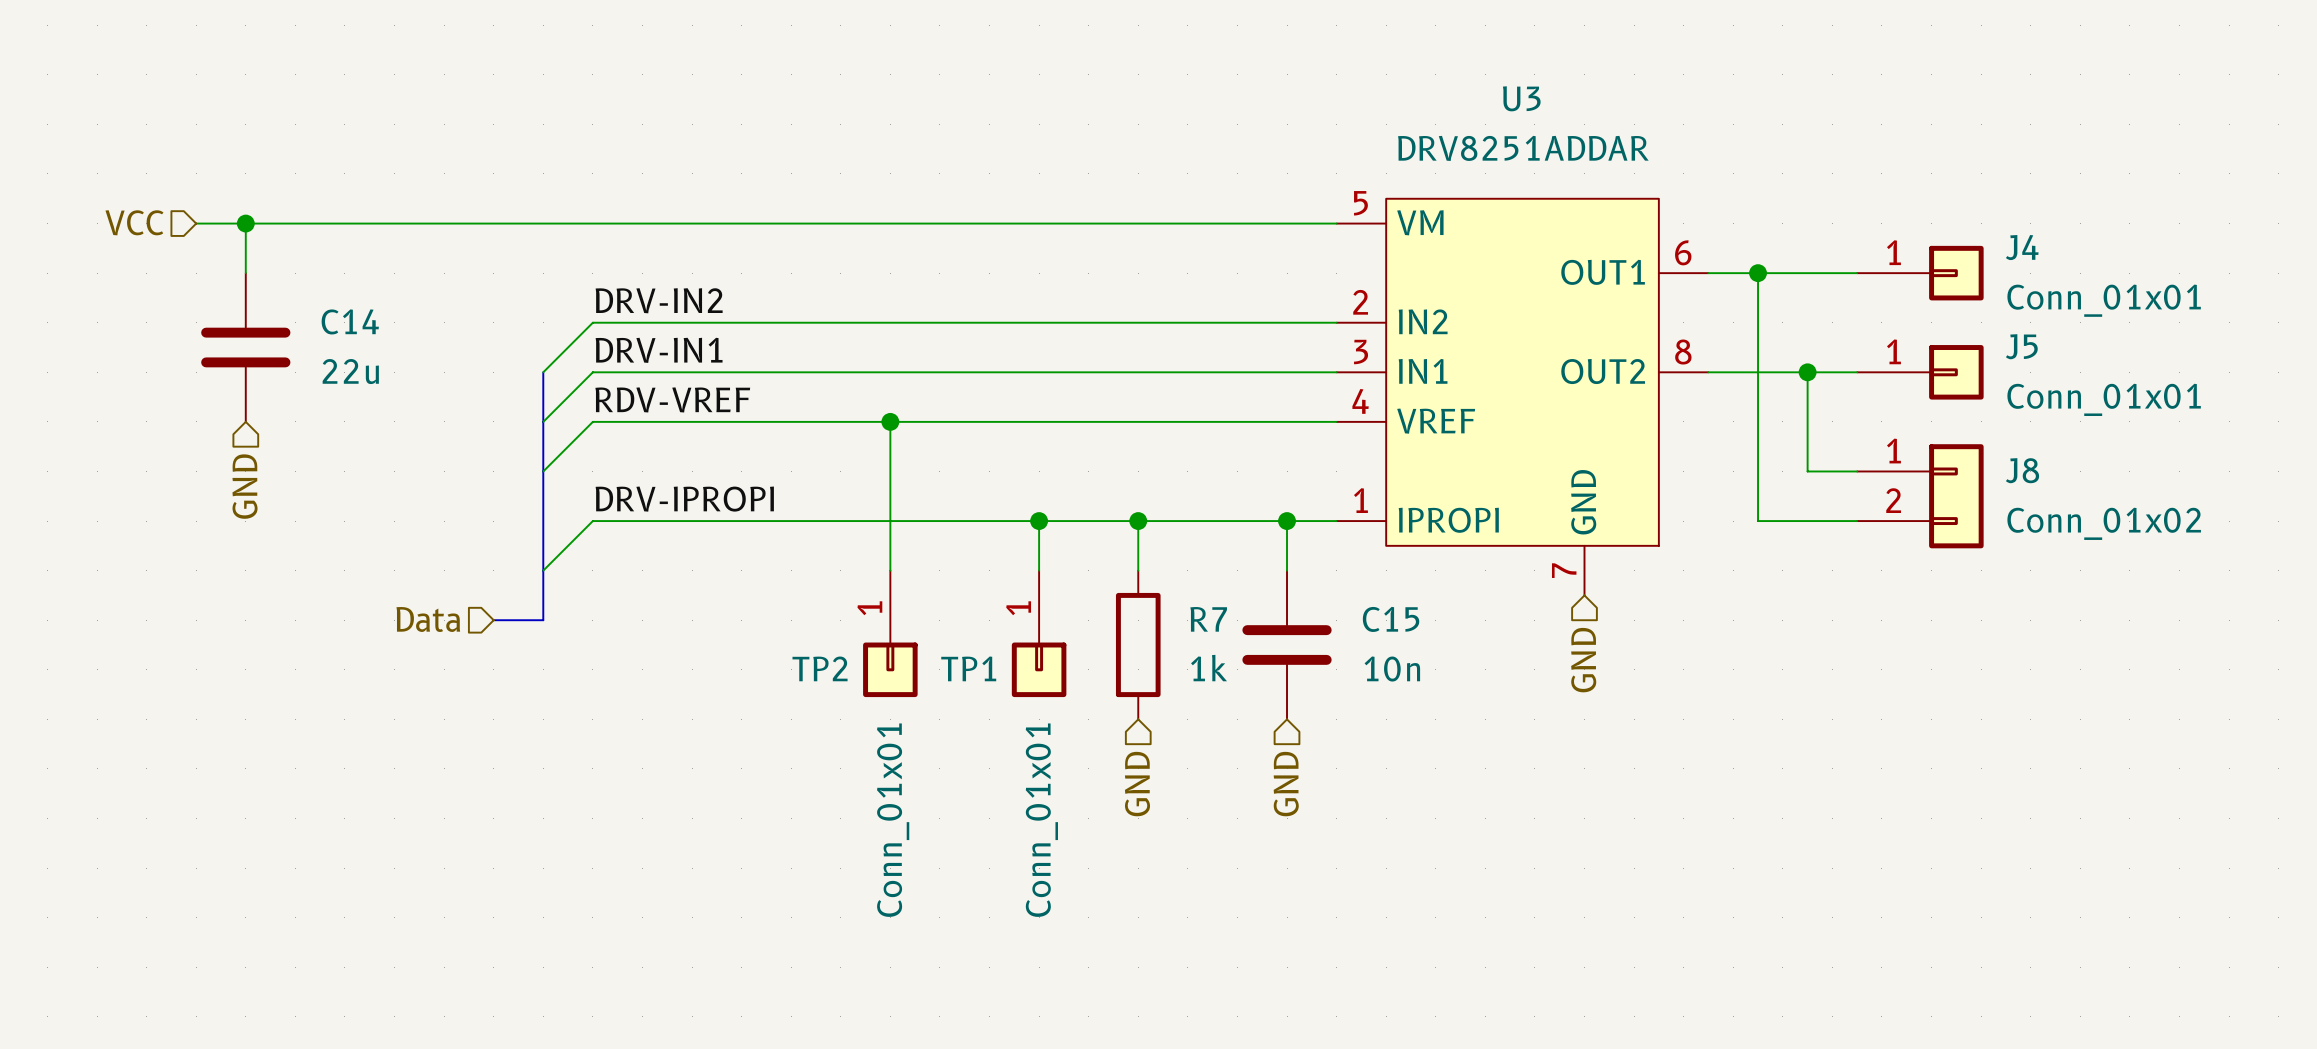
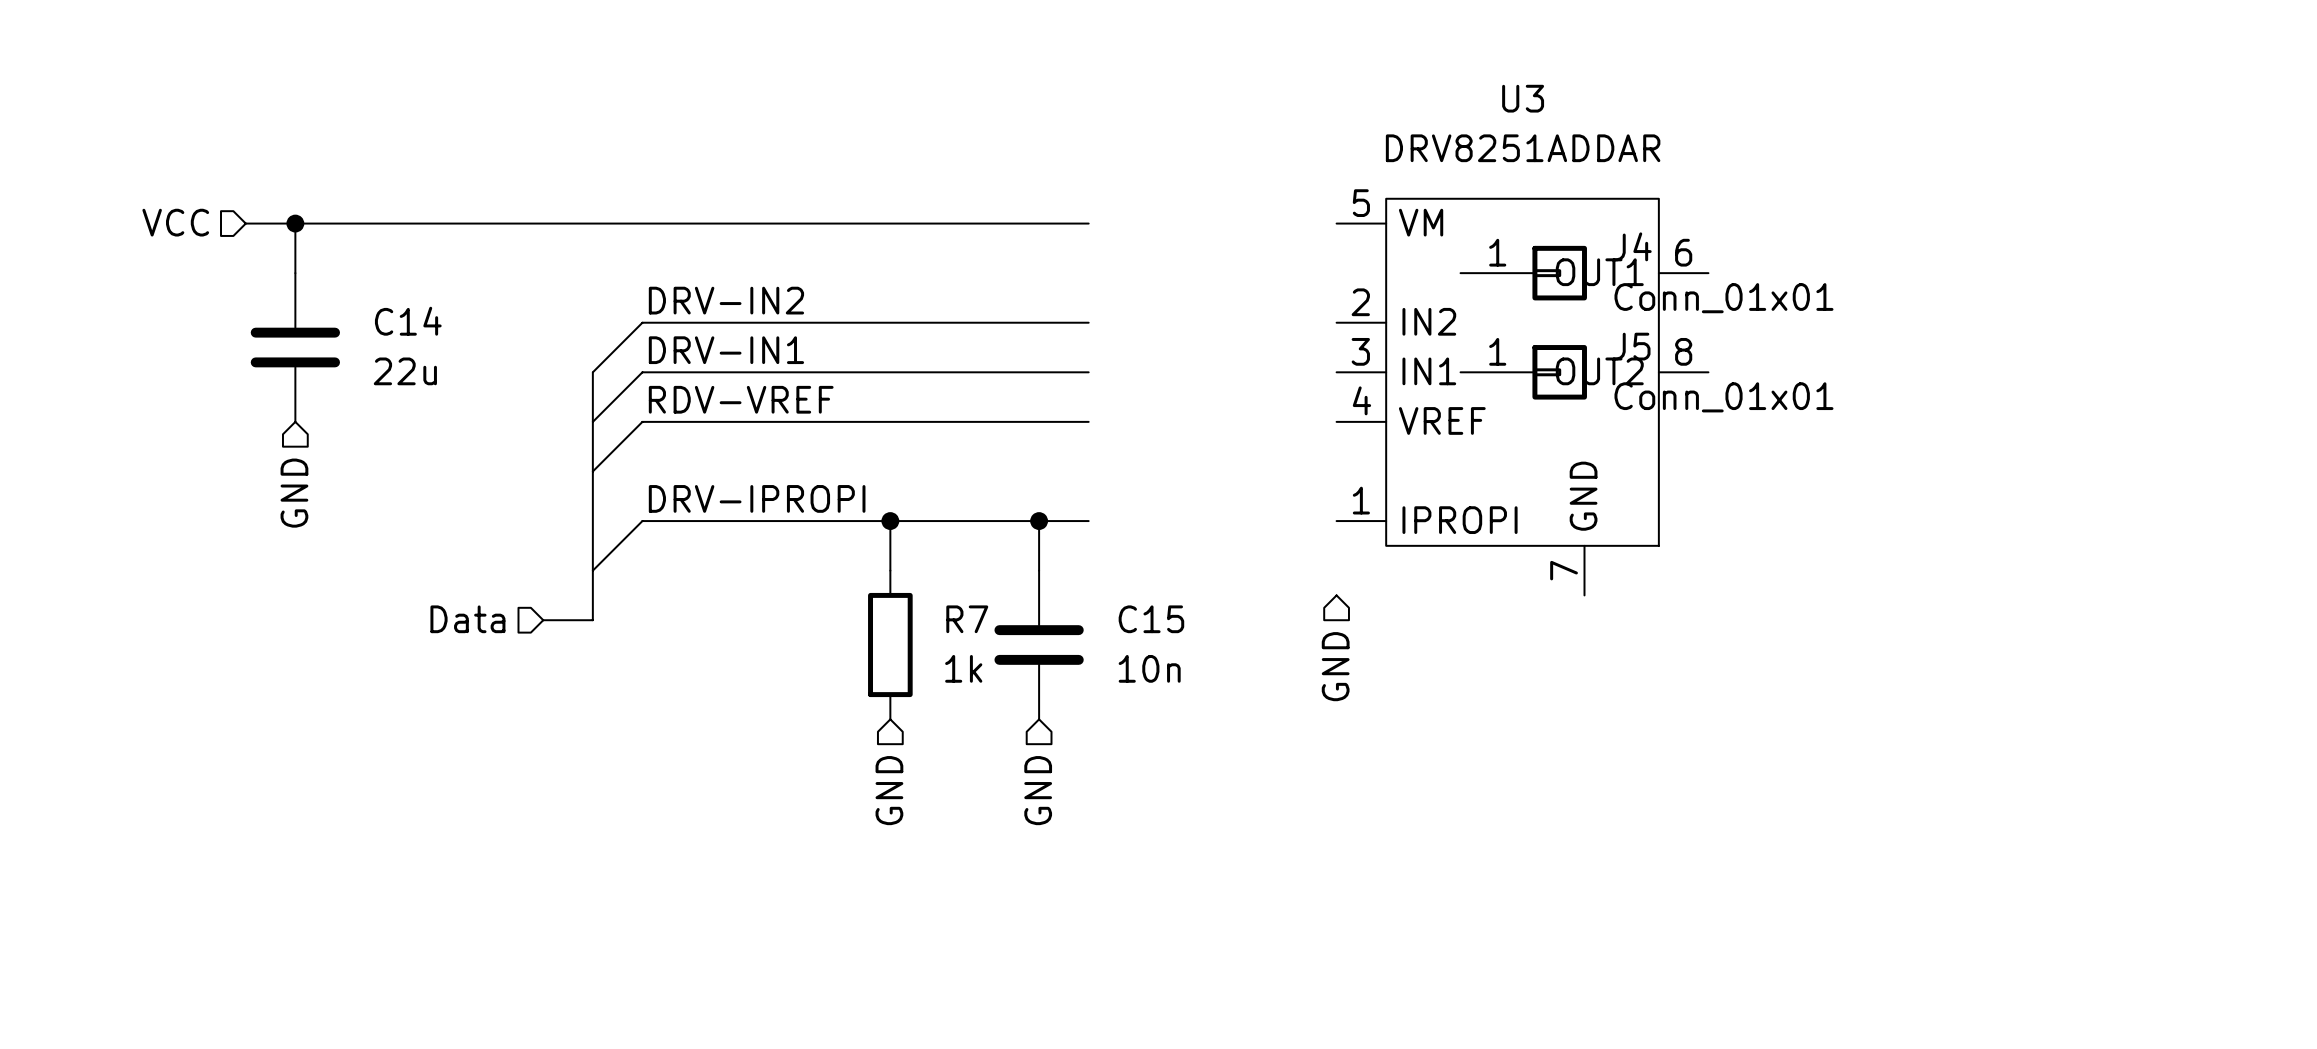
hierarchical label position: VCC (134, 222) -> VCC (175, 222)
wire: (196, 223) (245, 223) (245, 273) -> none
junction position: (245, 223) -> (295, 223)
wire: none -> (295, 223) (295, 273)
wire: (1088, 223) (1336, 223) -> none
wire: (1708, 273) (1857, 273) -> none
wire: (1758, 273) (1758, 521) (1857, 521) -> none
junction: (1758, 273) -> none
J4 position: (1920, 273) -> (1523, 273)
label position: DRV-IN2 (659, 300) -> DRV-IN2 (726, 300)
wire: (642, 322) (592, 322) (543, 372) -> (642, 322) (592, 372)
wire: (1088, 322) (1336, 322) -> none
C14 position: (245, 347) -> (295, 347)
label position: DRV-IN1 (659, 350) -> DRV-IN1 (726, 350)
bus: (543, 372) (543, 620) (493, 620) -> (592, 372) (592, 620) (543, 620)
wire: (642, 372) (592, 372) (543, 421) -> (642, 372) (592, 421)
wire: (1088, 372) (1336, 372) -> none
wire: (1708, 372) (1857, 372) -> none
wire: (1807, 372) (1807, 471) (1857, 471) -> none
junction: (1807, 372) -> none
J5 position: (1920, 372) -> (1523, 372)
label position: RDV-VREF (672, 399) -> RDV-VREF (741, 399)
wire: (642, 421) (592, 421) (543, 471) -> (642, 421) (592, 471)
wire: (890, 421) (890, 521) -> none
junction position: (890, 421) -> (890, 521)
wire: (1088, 421) (1336, 421) -> none
hierarchical label position: GND (245, 486) -> GND (294, 493)
J8: Conn_01x02 (1920, 496) -> none
label position: DRV-IPROPI (684, 499) -> DRV-IPROPI (757, 498)
wire: (642, 521) (592, 521) (543, 570) -> (642, 521) (592, 570)
wire: (1088, 521) (1336, 521) -> none
wire: (1138, 521) (1138, 570) -> none
junction: (1138, 521) -> none
wire: (1287, 521) (1287, 570) -> none
junction: (1287, 521) -> none
hierarchical label position: Data (428, 619) -> Data (467, 619)
TP2: Conn_01x01 (890, 633) -> none
TP1: Conn_01x01 (1039, 633) -> none
R7 position: (1138, 645) -> (890, 645)
C15 position: (1287, 645) -> (1039, 645)
hierarchical label: none -> GND (1335, 666)
hierarchical label: GND (1583, 660) -> none
hierarchical label: none -> GND (889, 790)
hierarchical label position: GND (1137, 784) -> GND (1038, 790)
hierarchical label: GND (1286, 784) -> none

